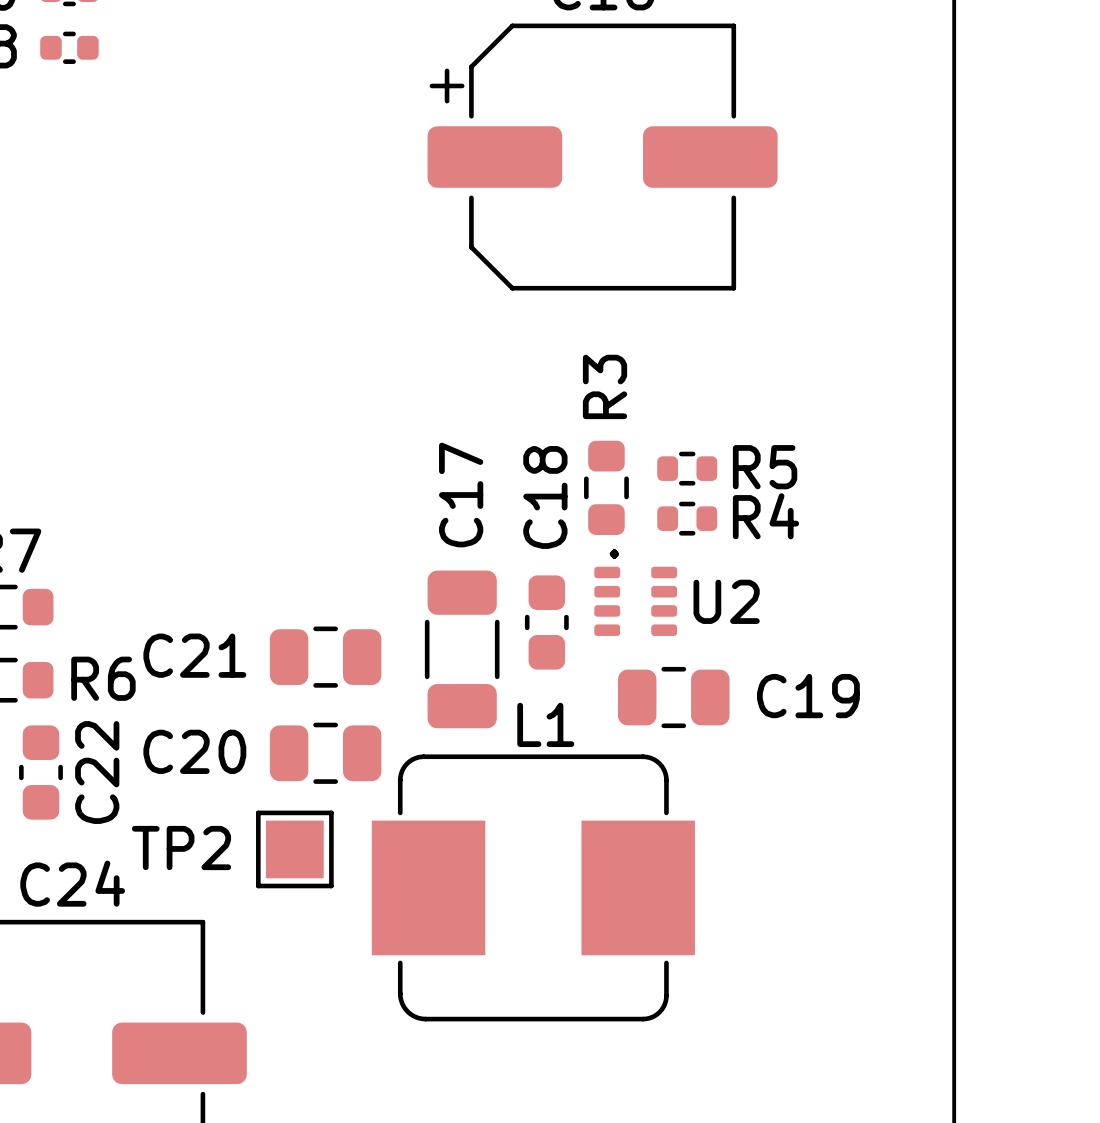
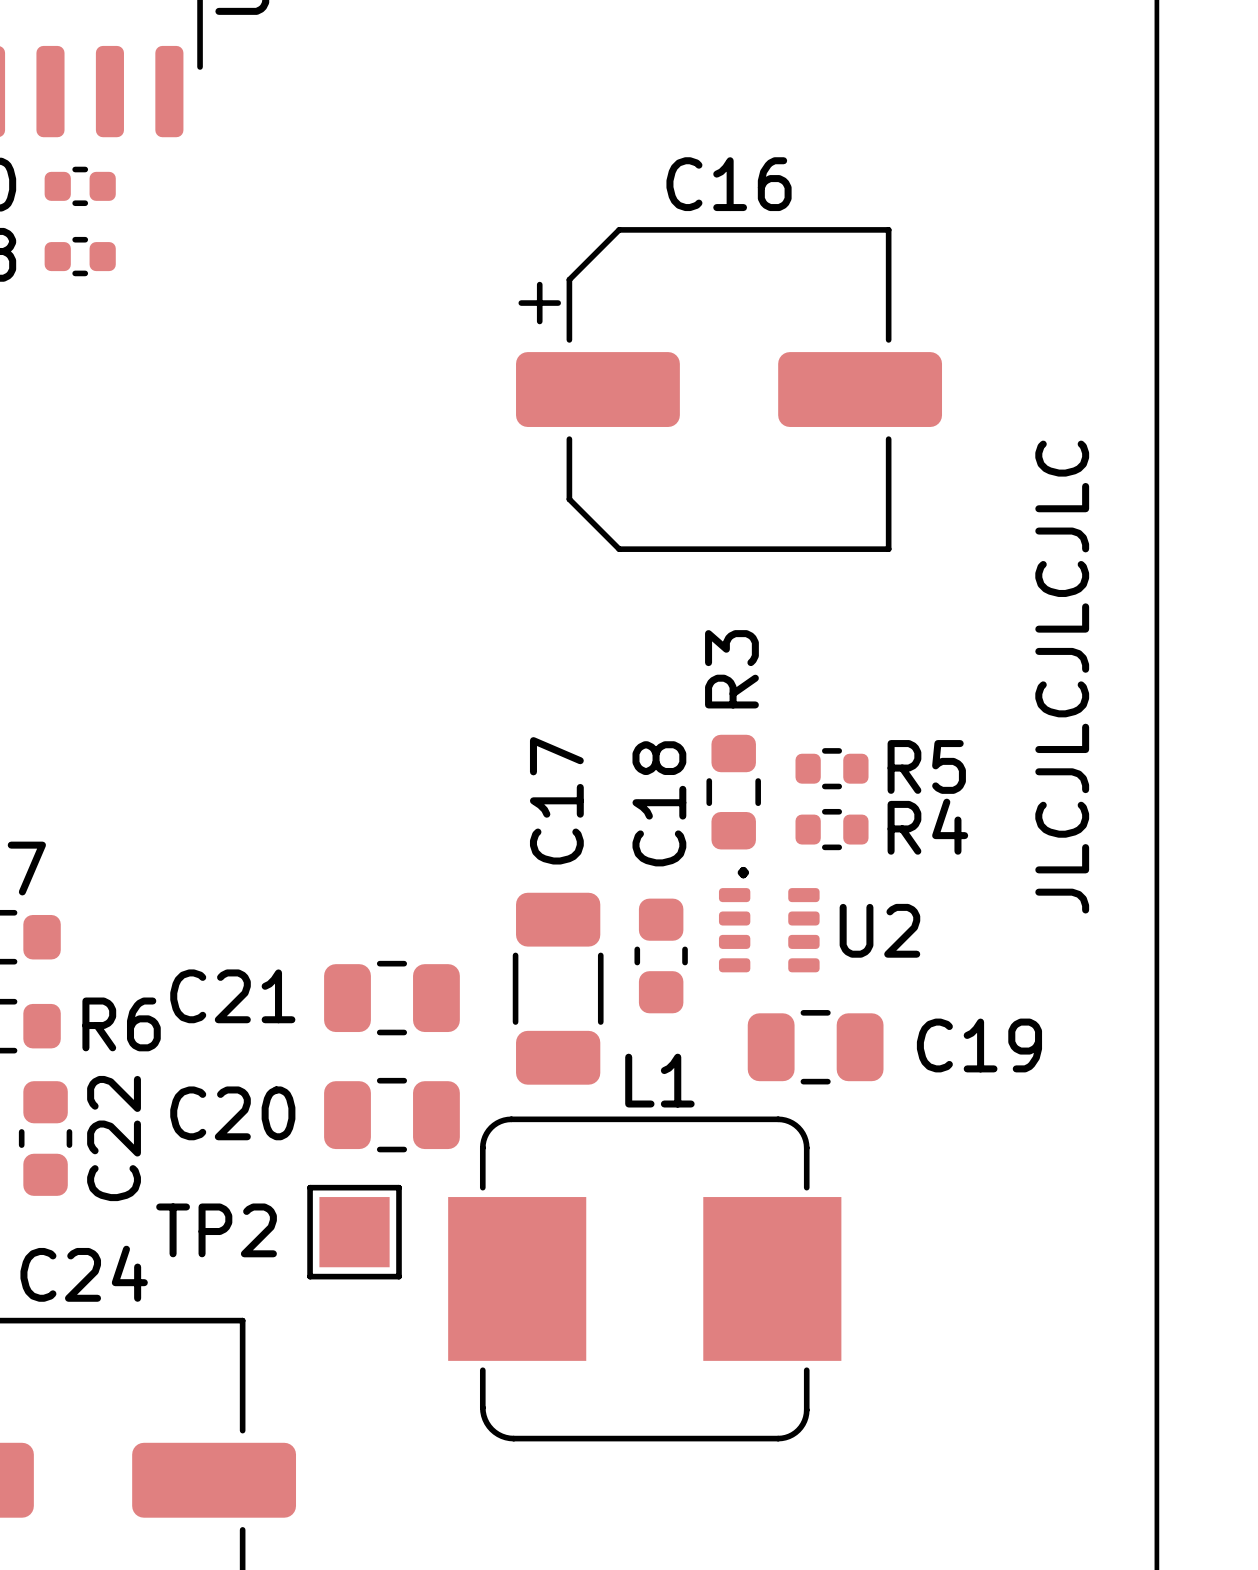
text: none -> JLCJLCJLCJLC (1062, 677)

